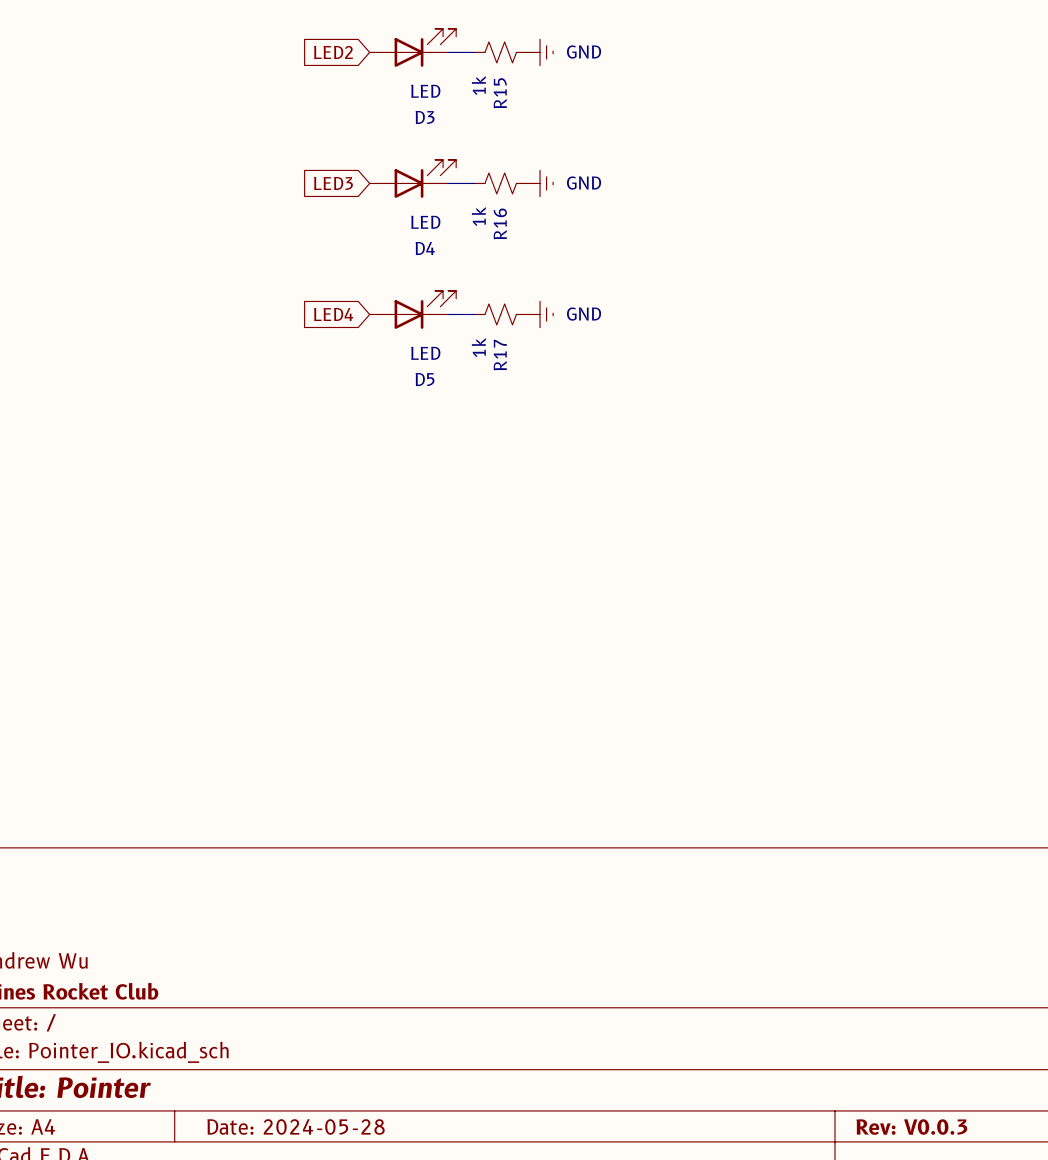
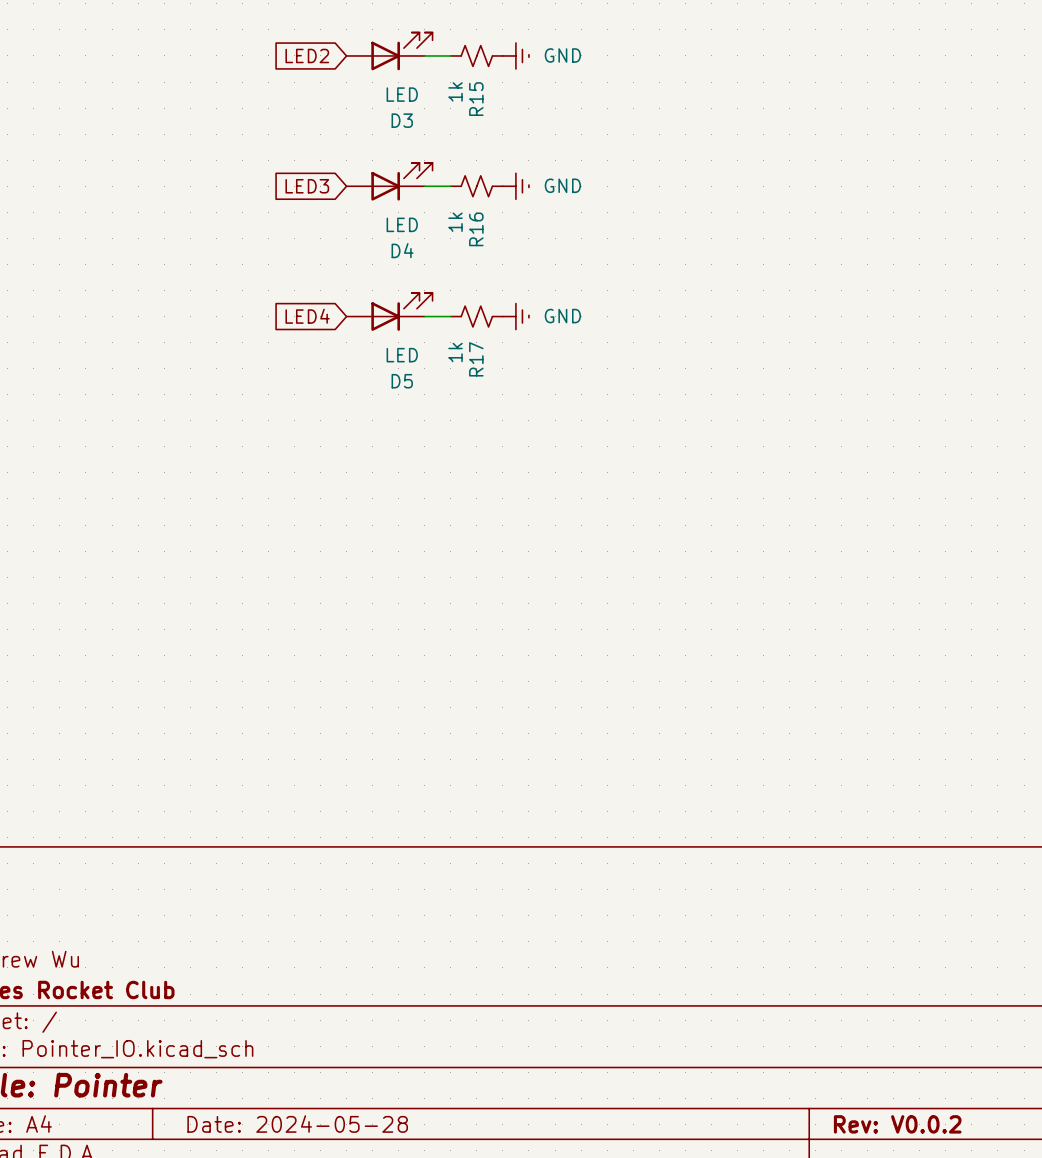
title block: Rev: V0.0.3 (911, 1127) -> Rev: V0.0.2 (897, 1124)

